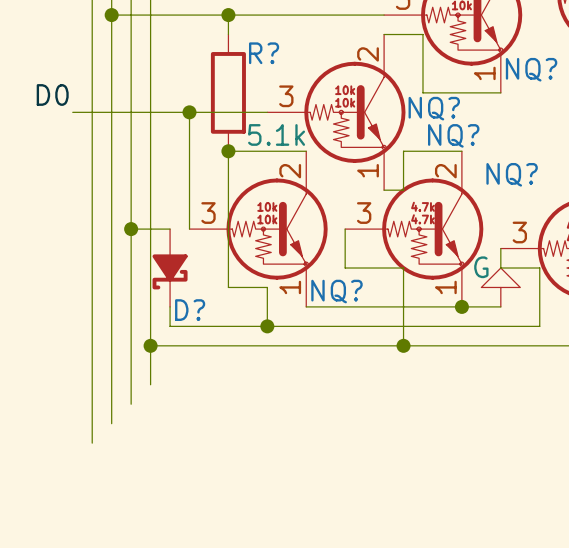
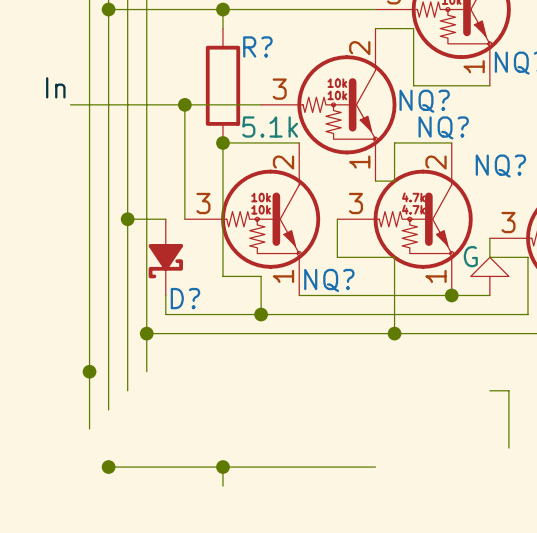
label: D0 (52, 94) -> In (55, 87)
junction: none -> (89, 371)
wire: none -> (489, 390) (508, 390) (508, 447)
wire: none -> (108, 467) (375, 467)
junction: none -> (108, 467)
wire: none -> (222, 467) (222, 486)
junction: none -> (222, 467)

